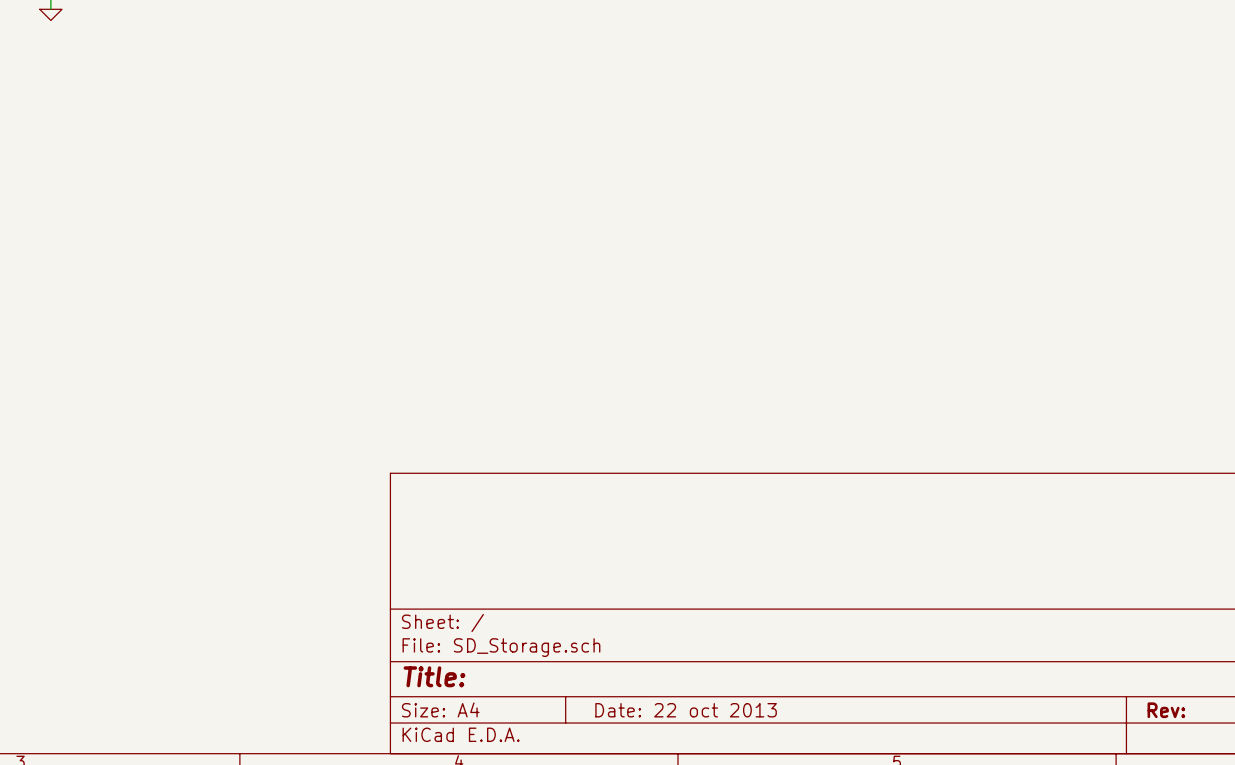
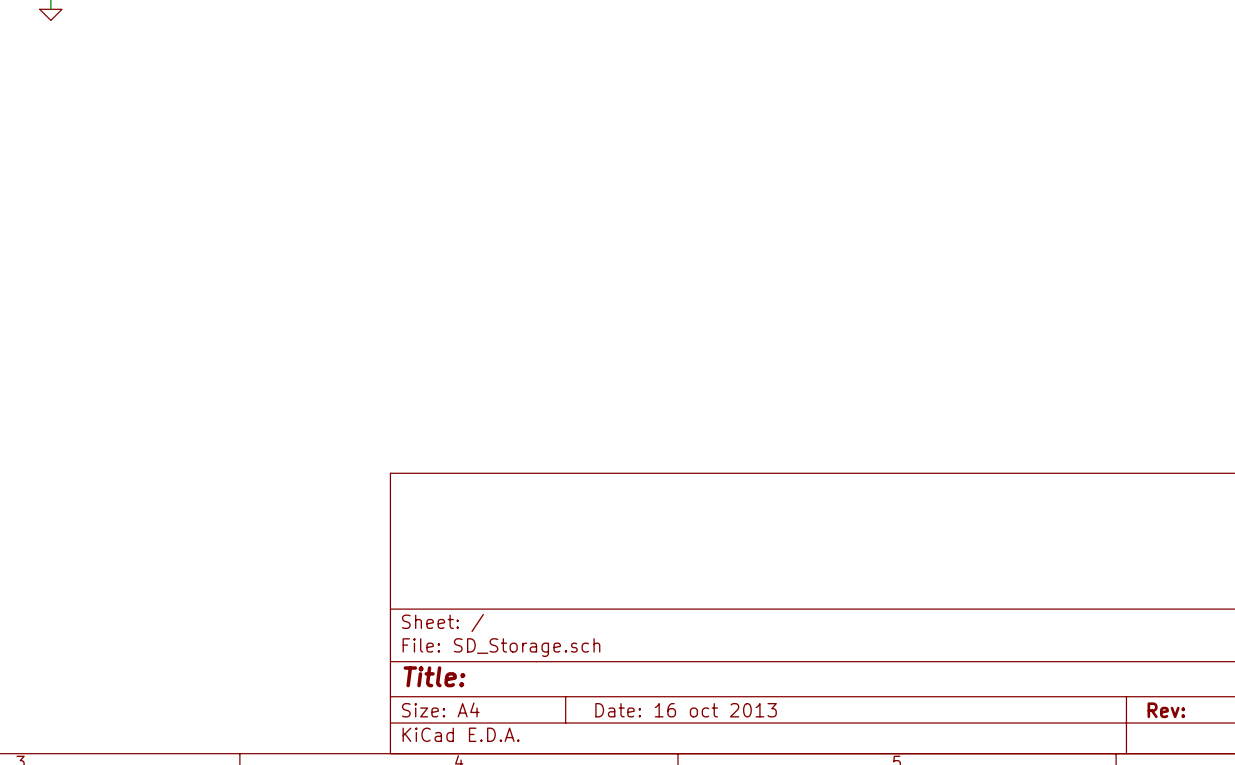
title block: Date: 22 oct 2013 (686, 710) -> Date: 16 oct 2013 (686, 710)

